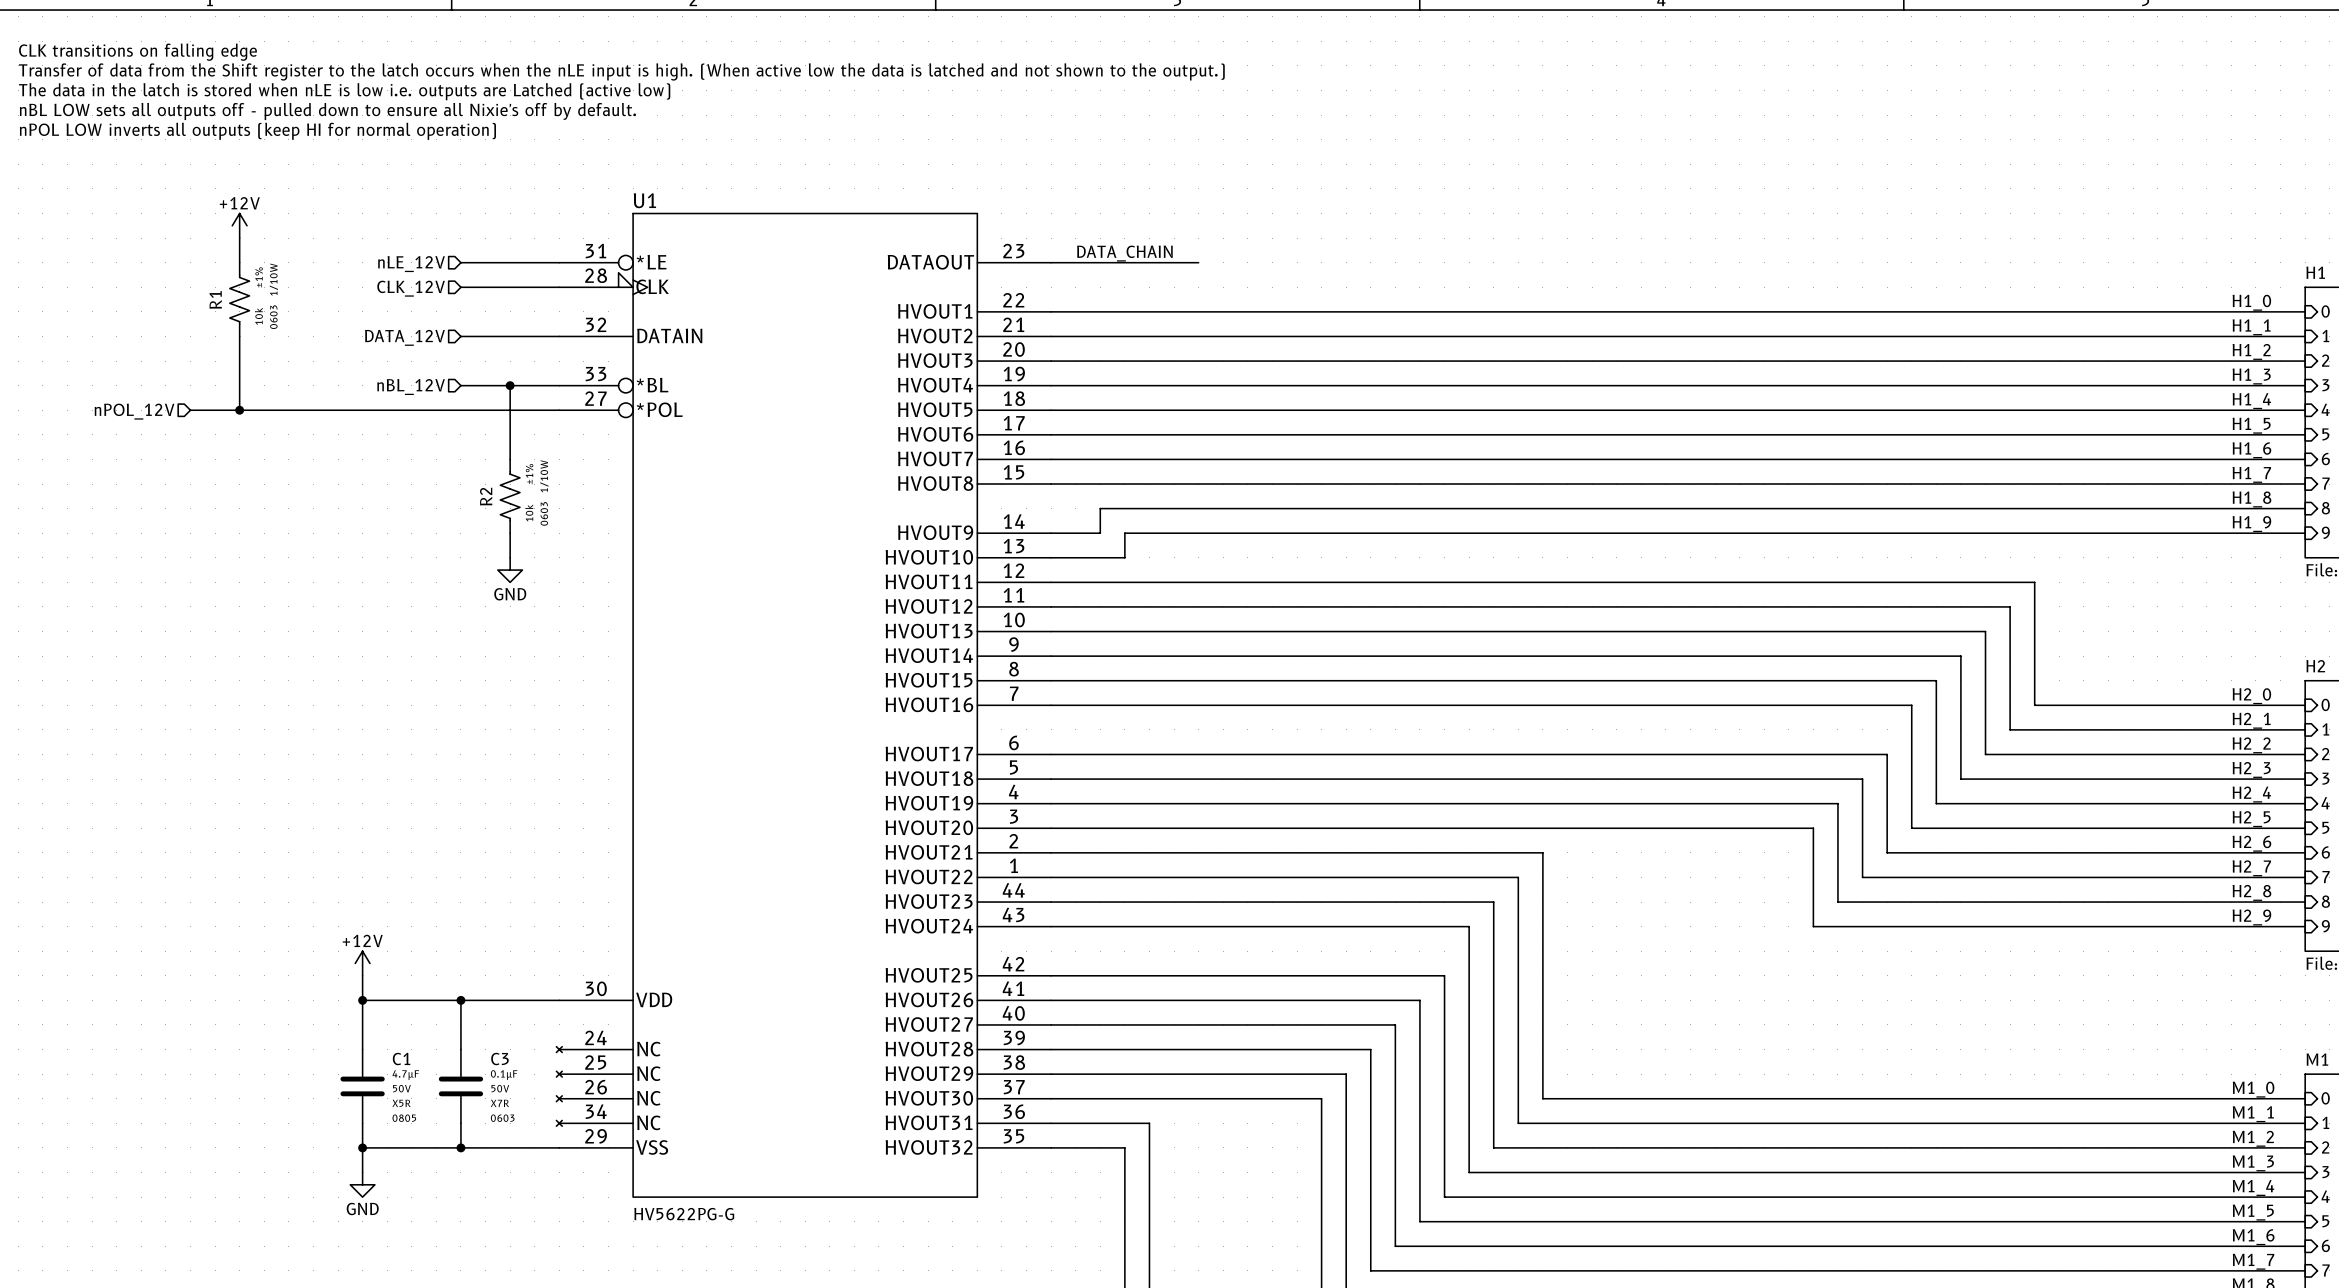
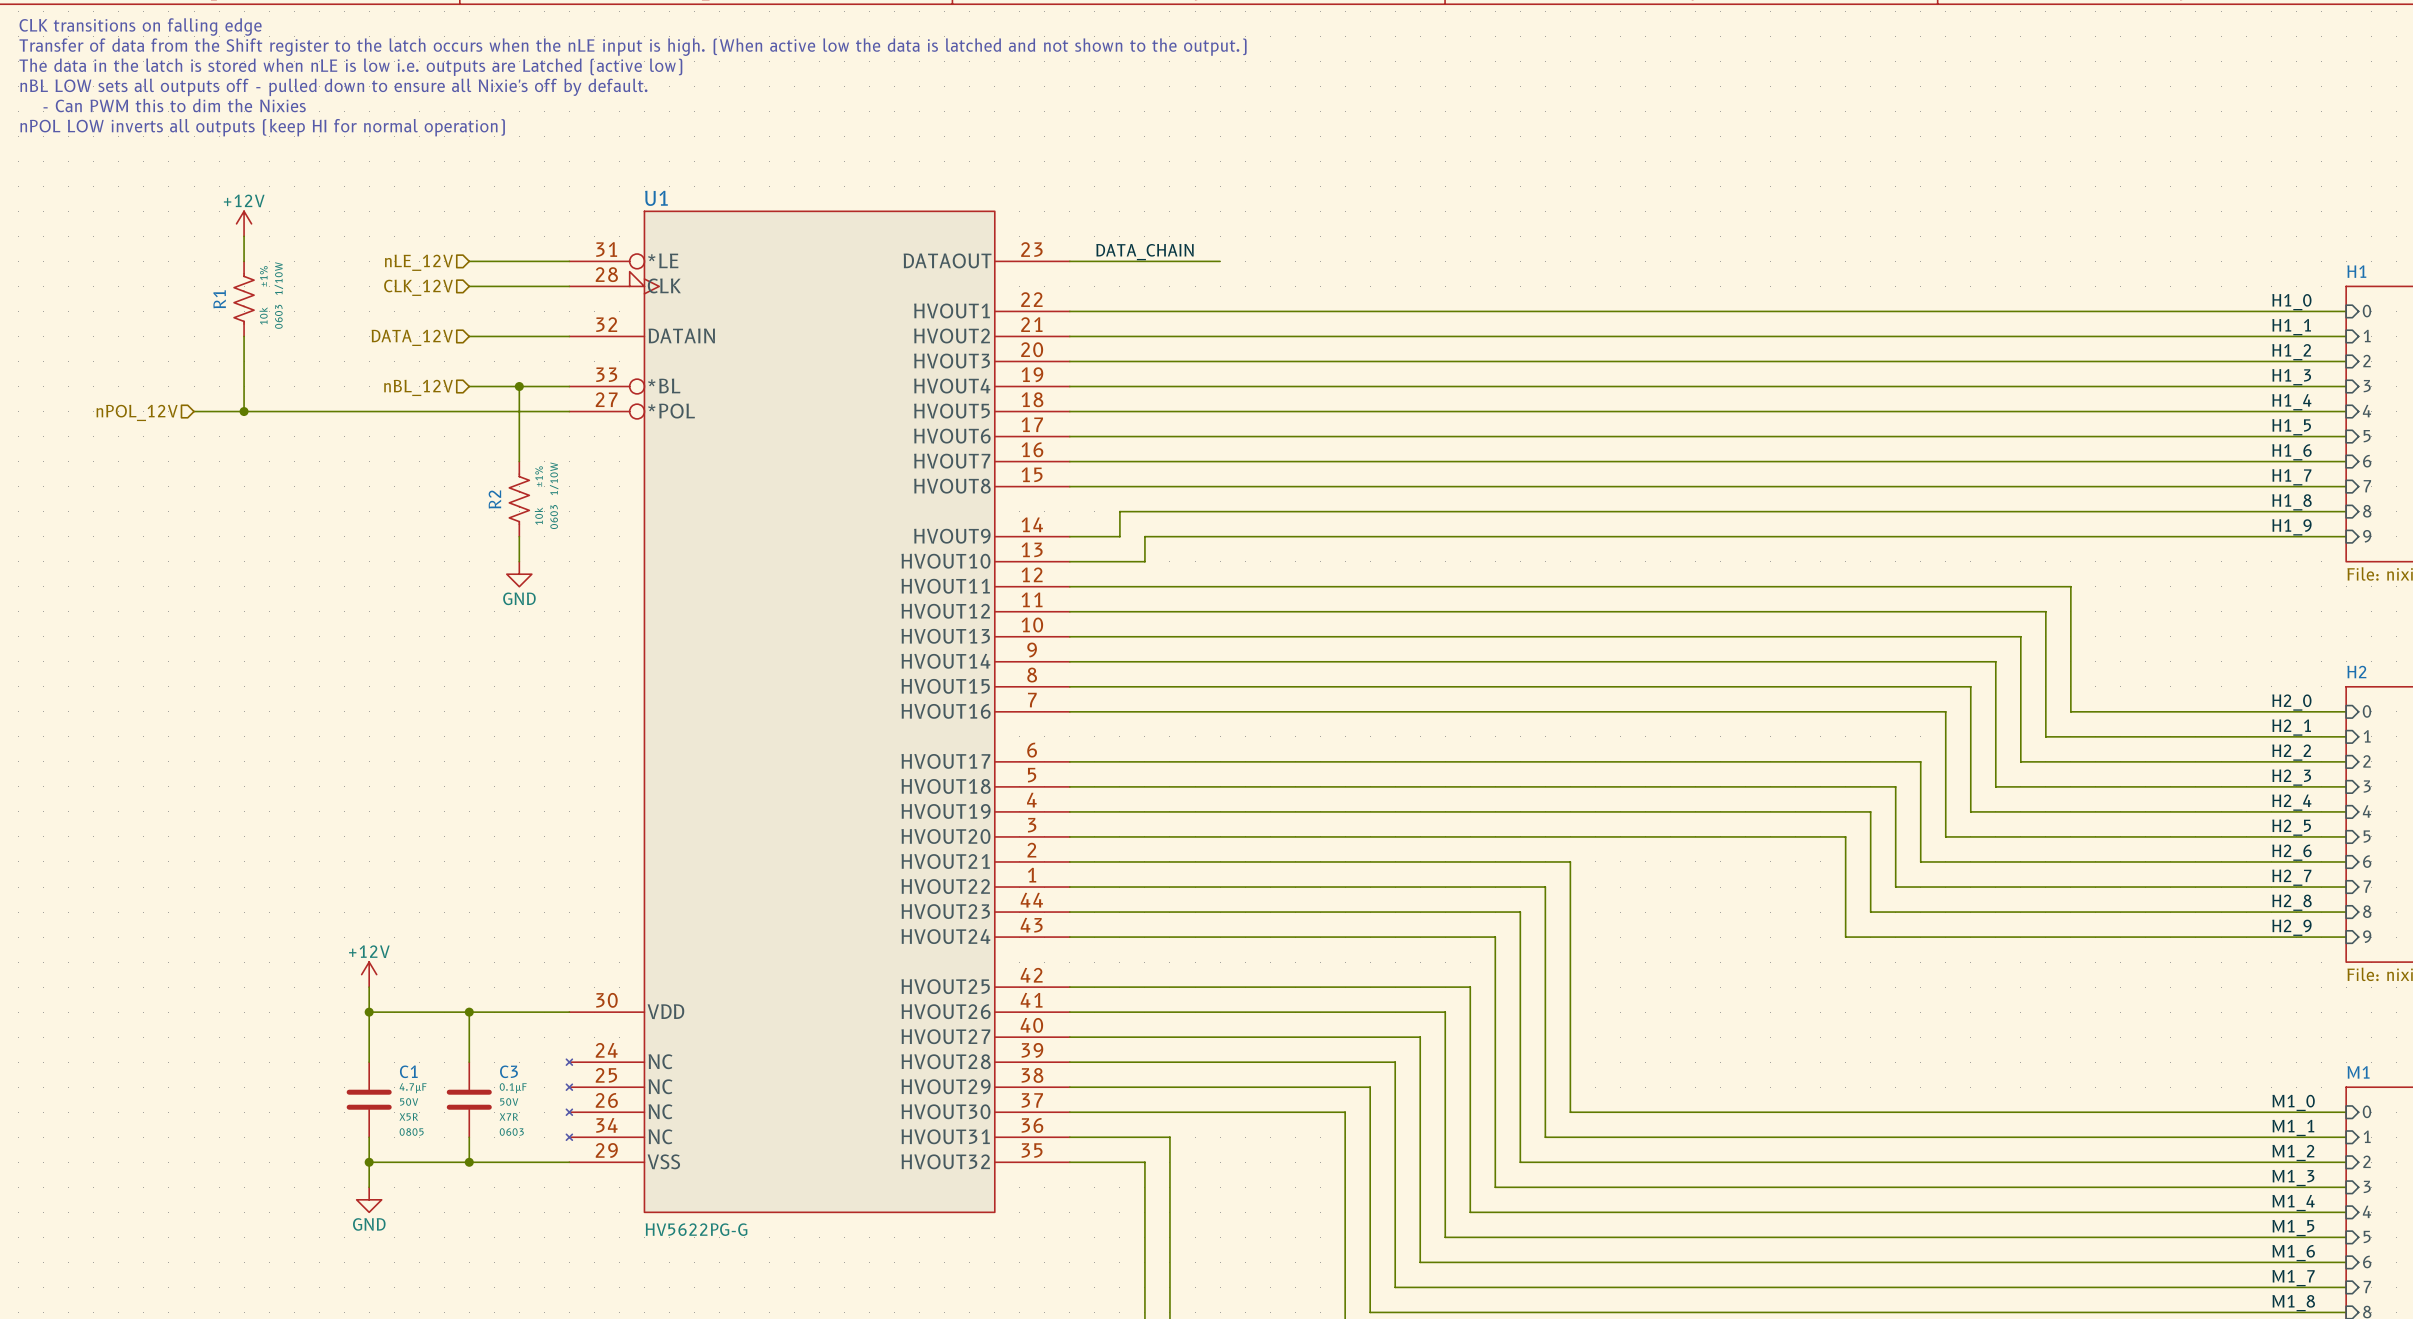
text: none -> CLK transitions on falling edge (140, 27)
text: CLK transitions on falling edge (137, 52) -> Transfer of data from the Shift register to the latch occurs when the nLE input is high. (When active low the data is latched and not shown to the output.) (633, 47)
text: Transfer of data from the Shift register to the latch occurs when the nLE input is high. (When active low the data is latched and not shown to the output.) (621, 71) -> The data in the latch is stored when nLE is low i.e. outputs are Latched (active low) (350, 67)
text: The data in the latch is stored when nLE is low i.e. outputs are Latched (active low) (344, 91) -> nBL LOW sets all outputs off - pulled down to ensure all Nixie's off by default. (333, 87)
text: nBL LOW sets all outputs off - pulled down to ensure all Nixie's off by default. (328, 111) -> - Can PWM this to dim the Nixies (174, 105)

